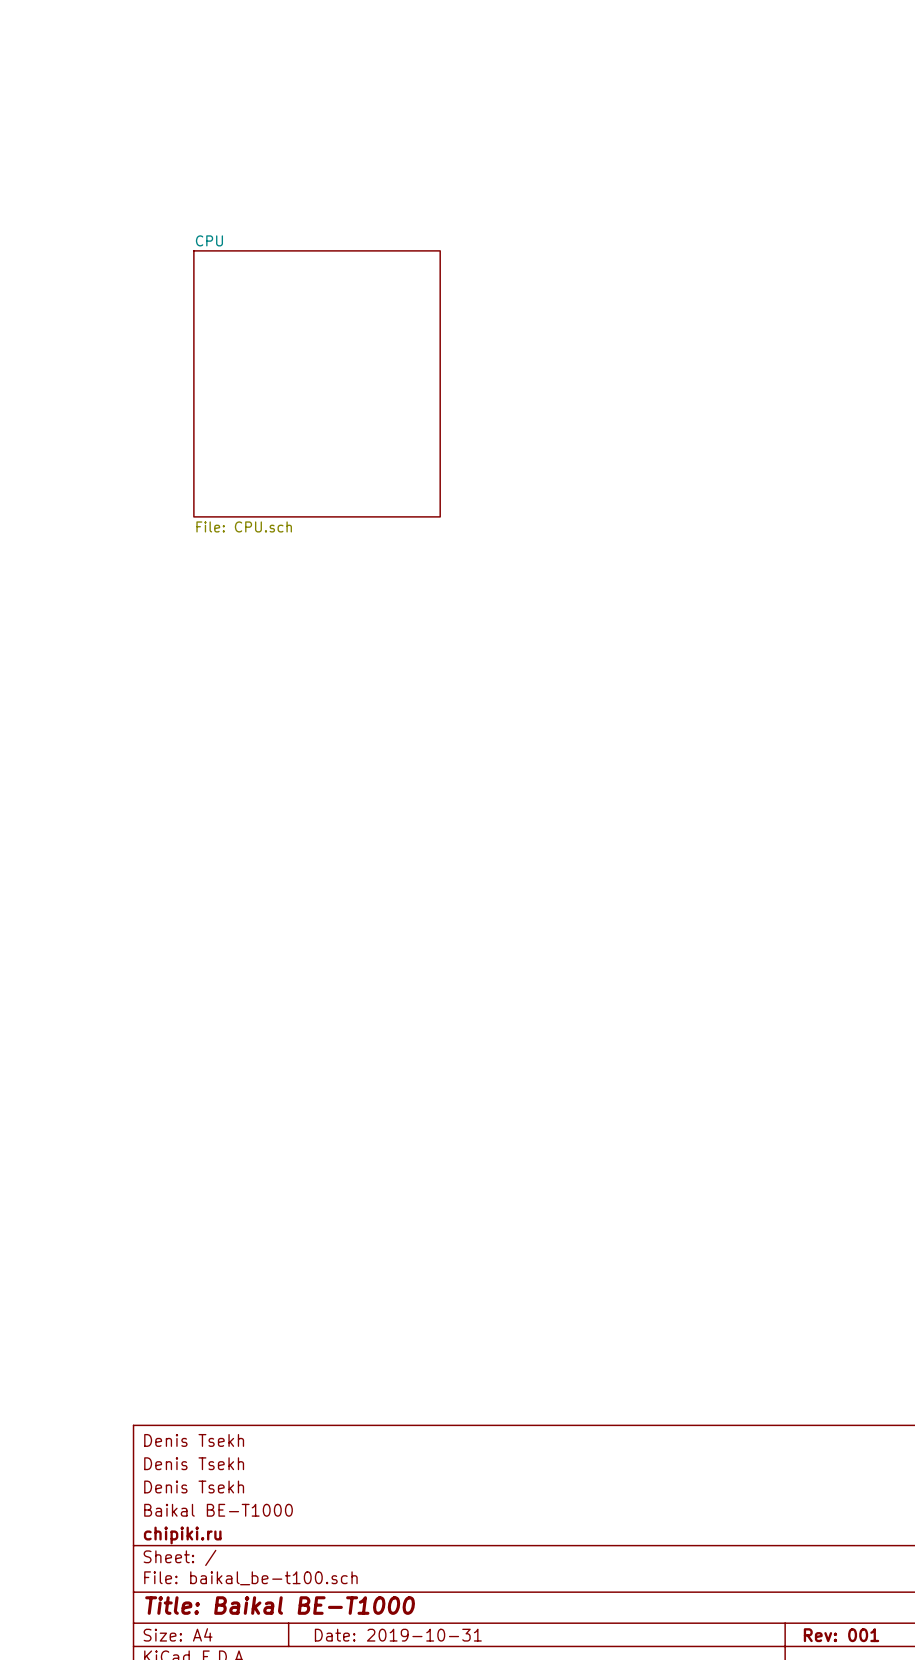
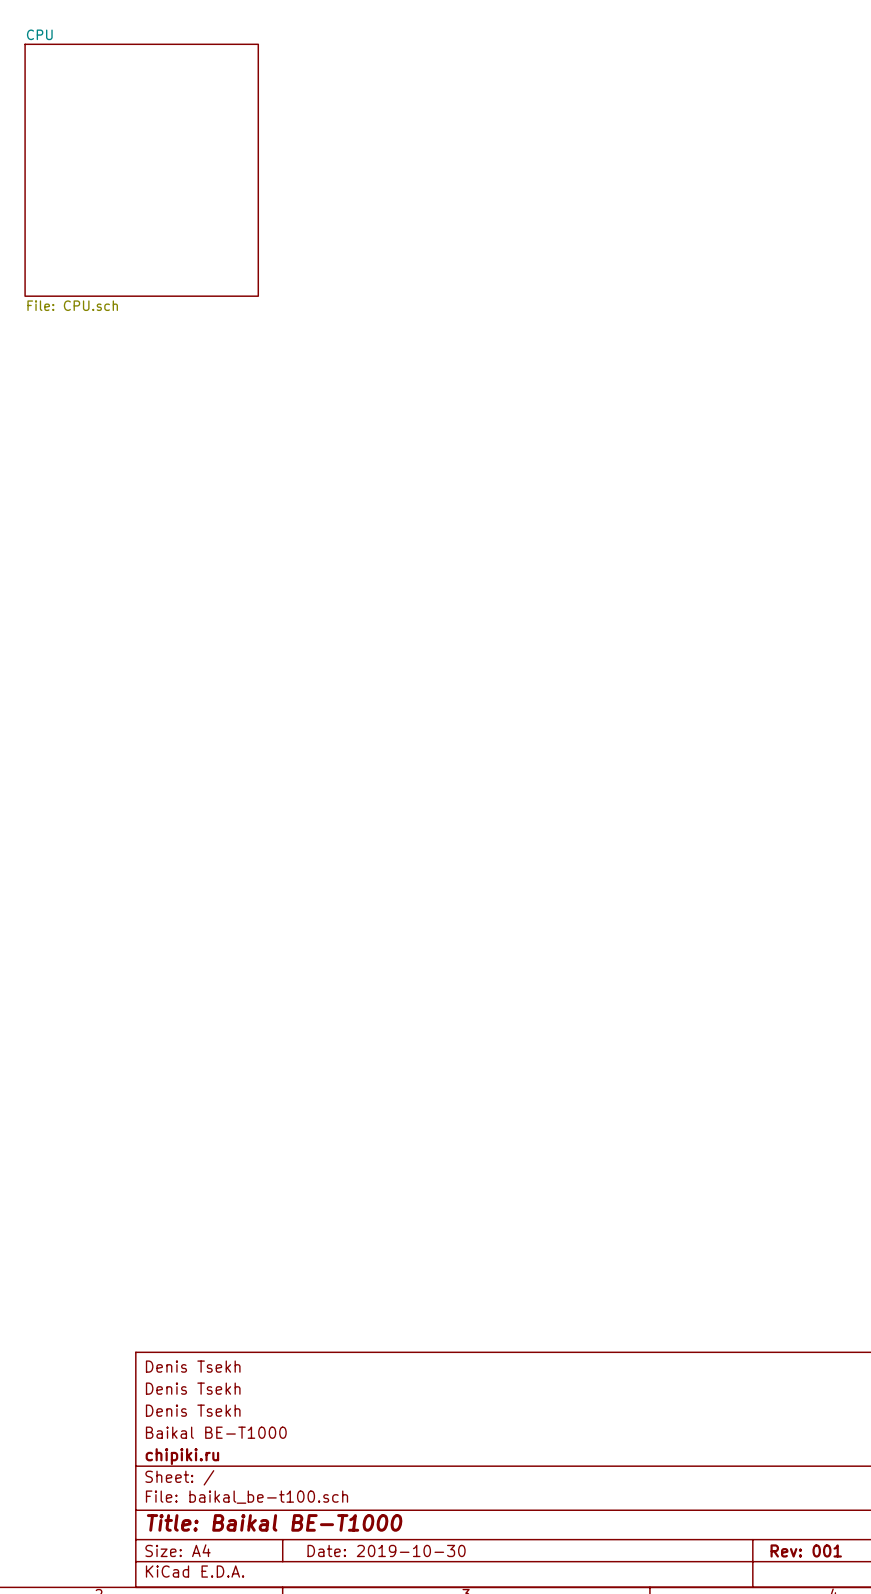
sheet CPU: none -> File: CPU.sch (141, 170)
sheet CPU: File: CPU.sch (317, 383) -> none
title block: Date: 2019-10-31 (398, 1635) -> Date: 2019-10-30 (386, 1550)

